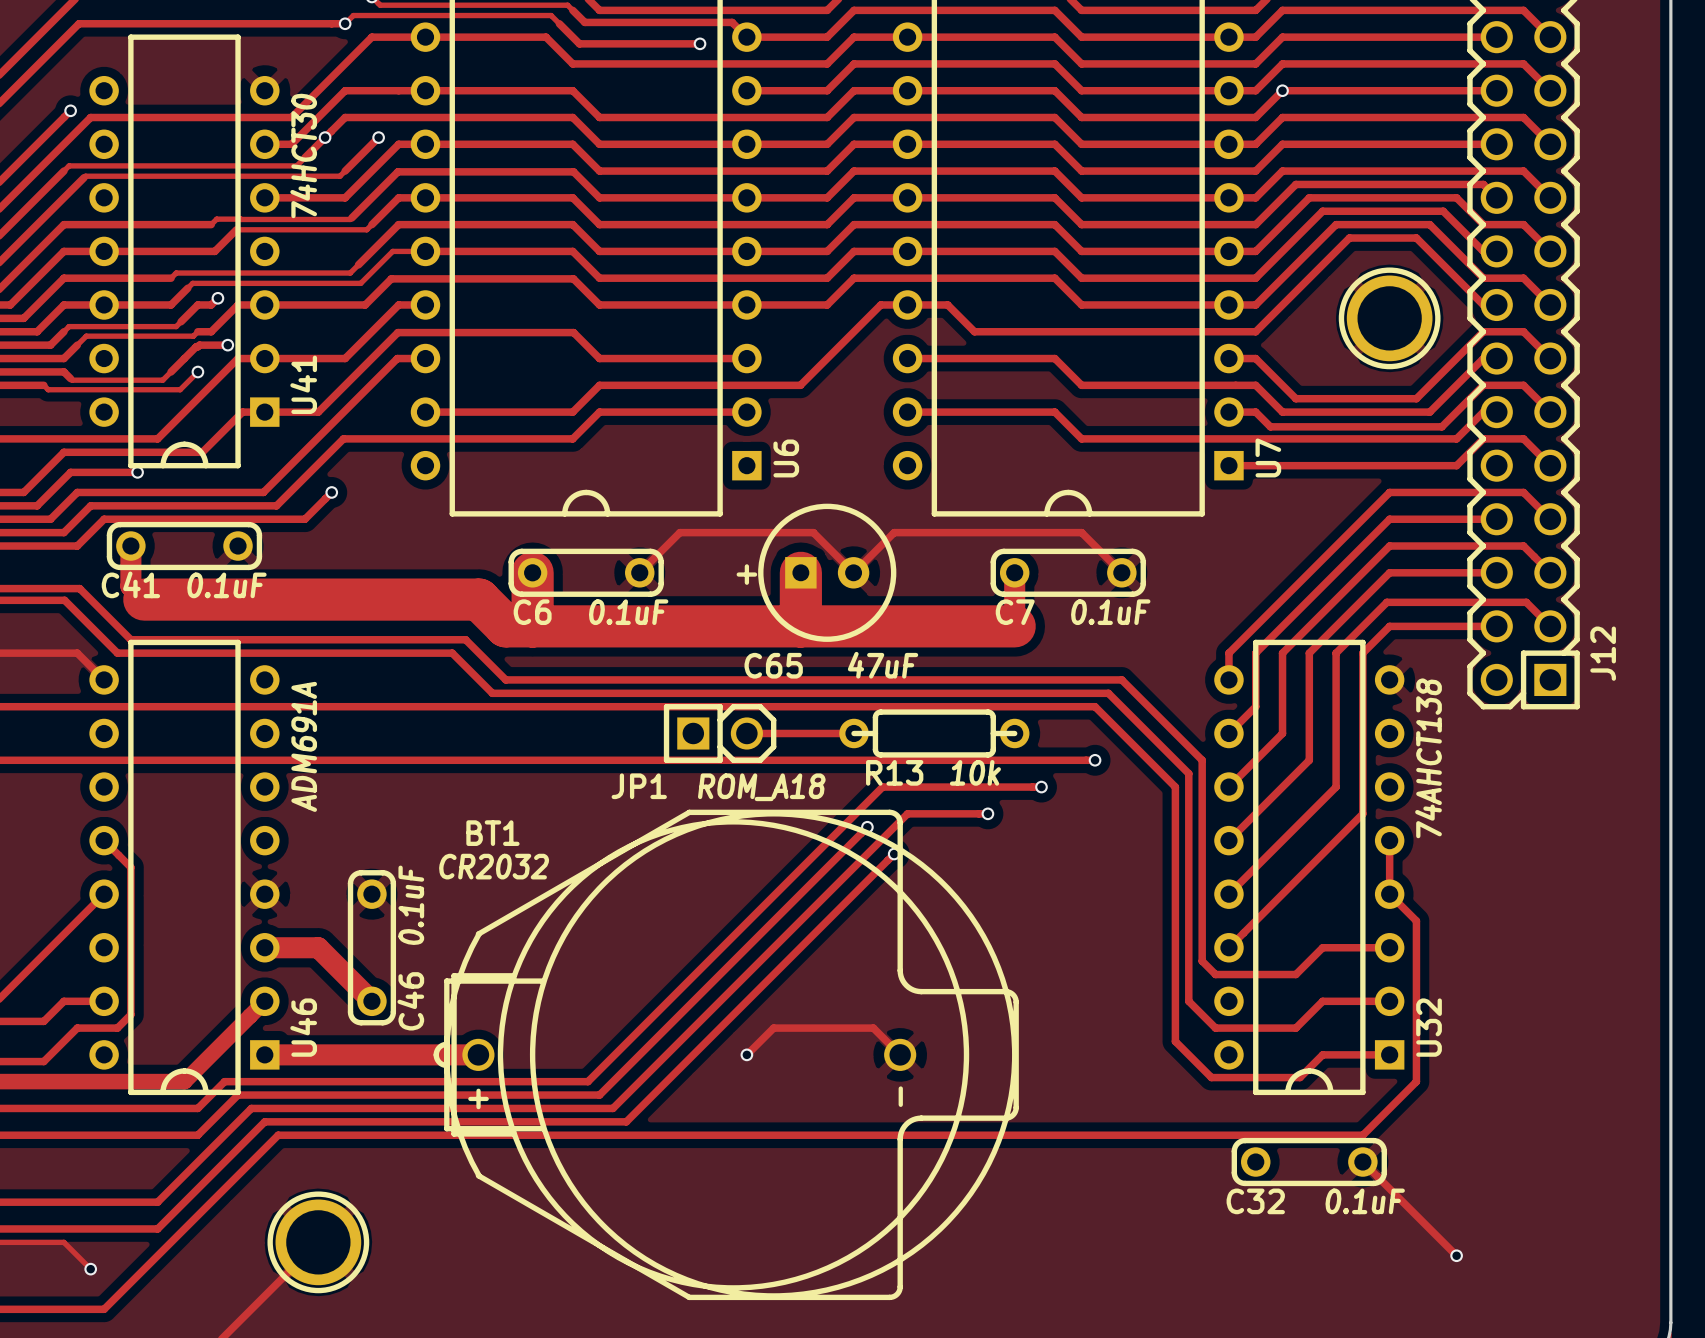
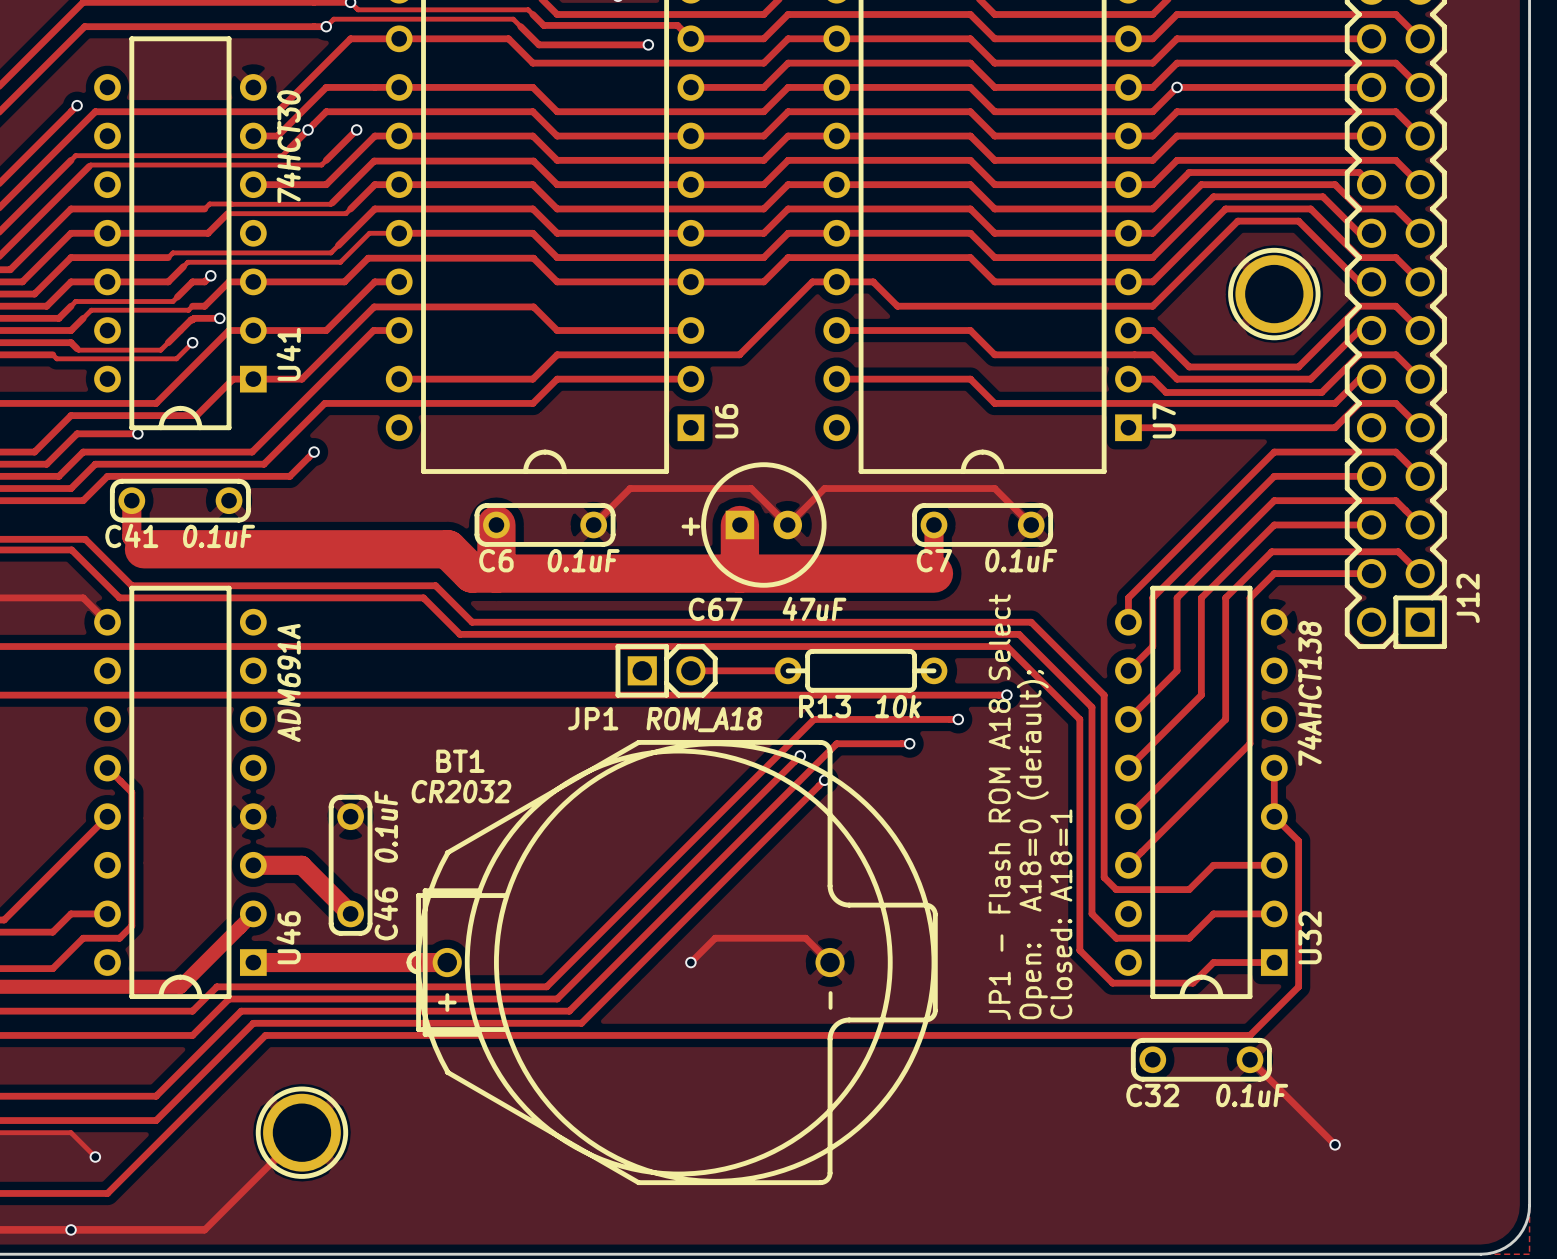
C65 name: C65 (773, 665) -> C67 (715, 609)
text: none -> JP1 - Flash ROM A18 Select (999, 807)
text: none -> Open: A18=0 (default); (1032, 844)
text: none -> Closed: A18=1 (1061, 914)

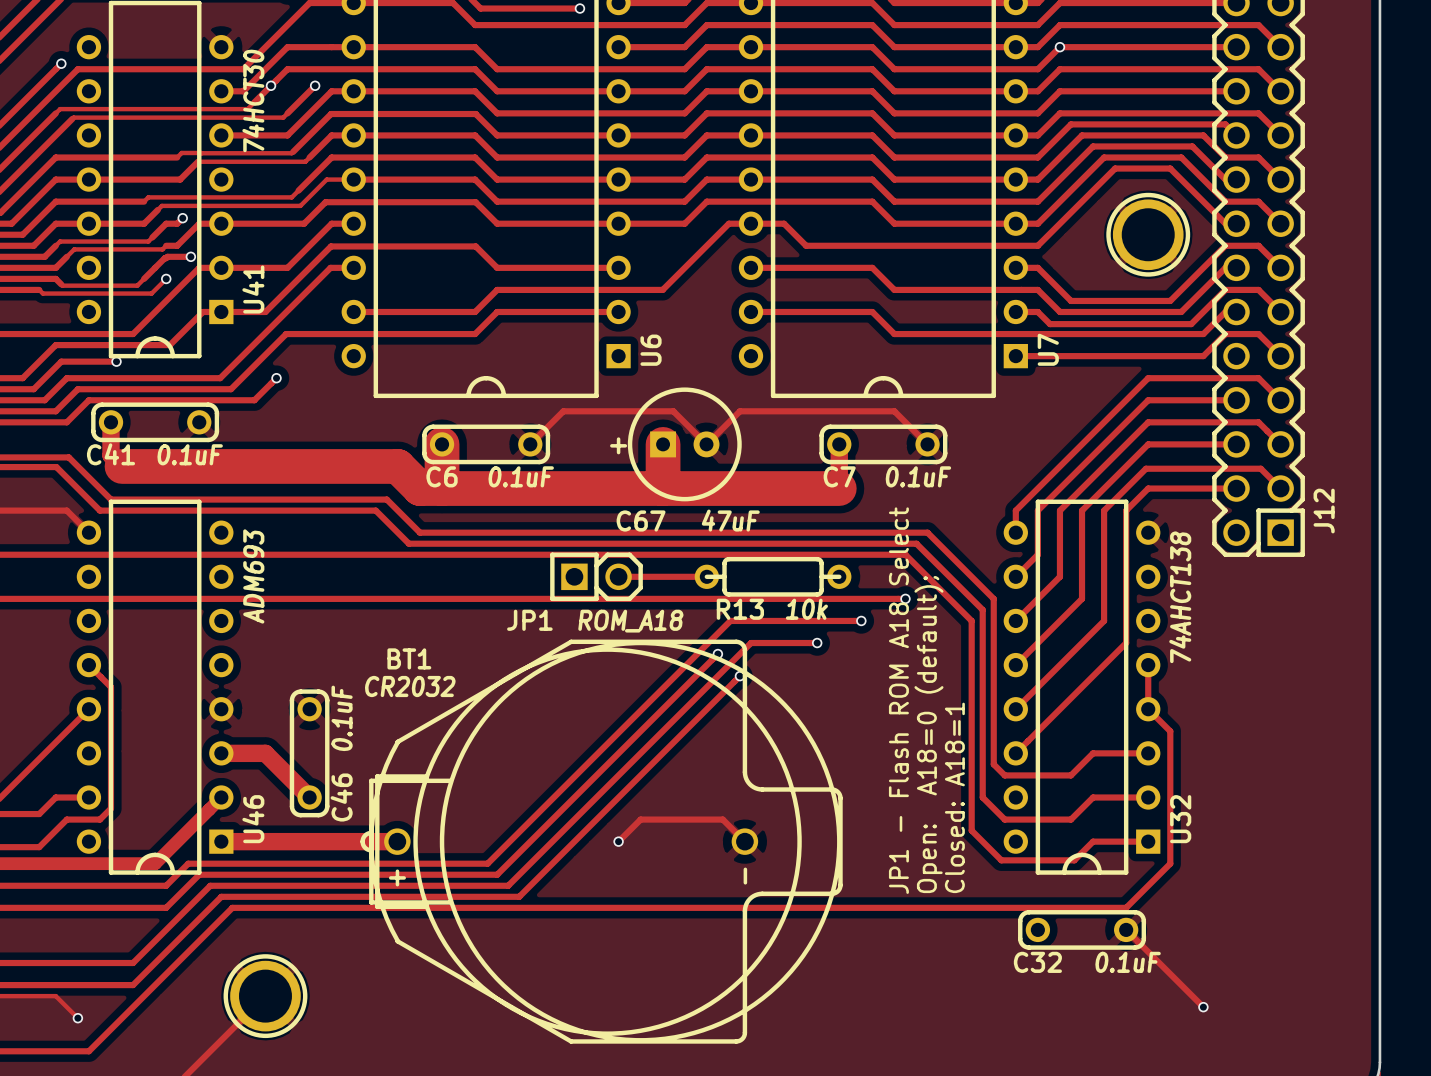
U46 value: ADM691A (289, 682) -> ADM693 (253, 576)

